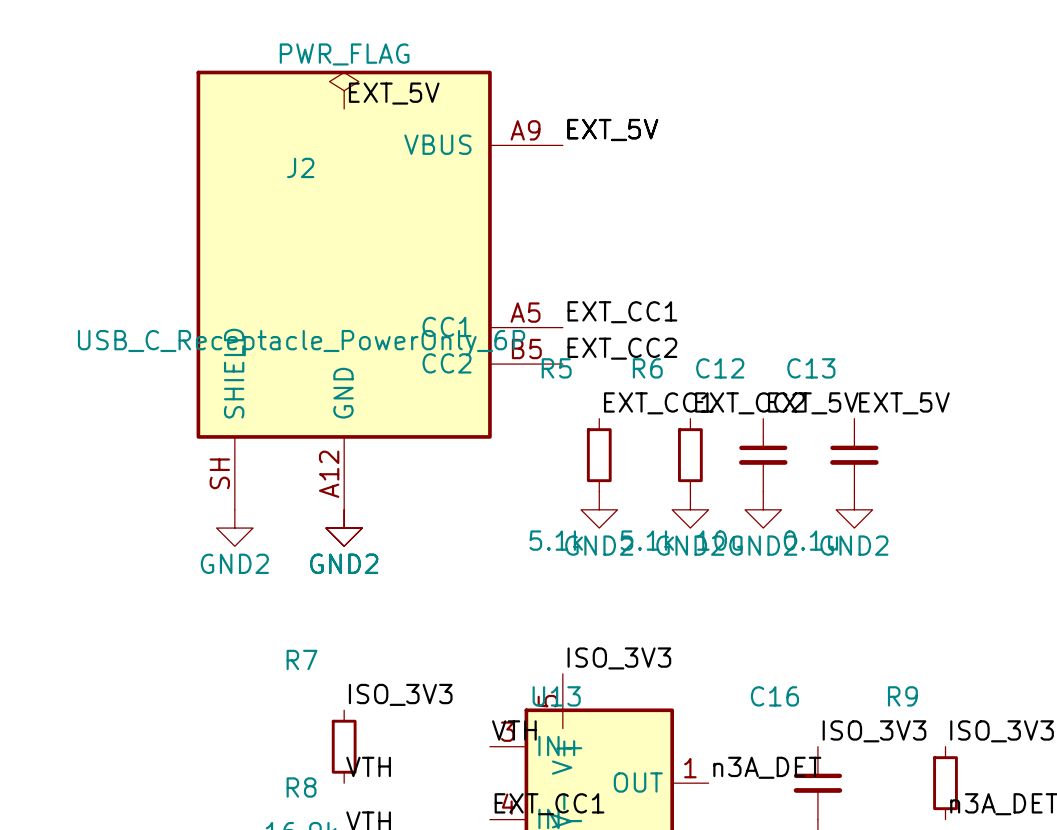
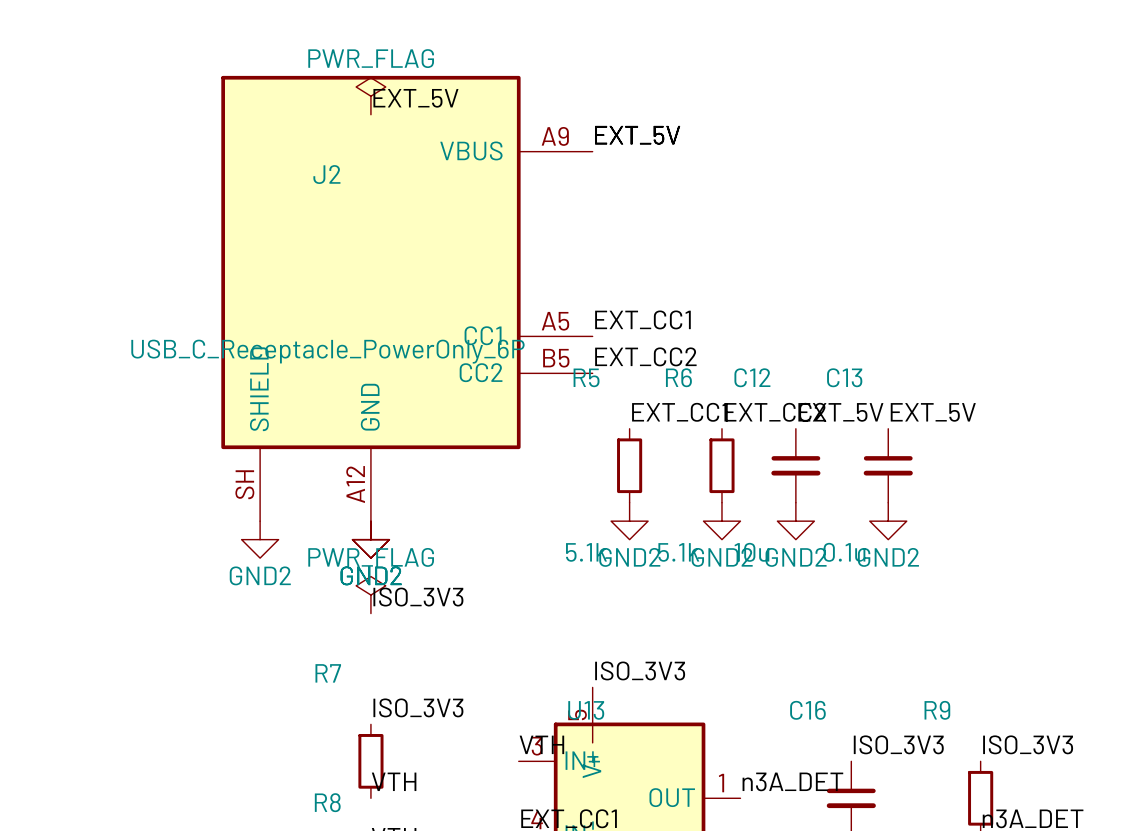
power symbol: none -> PWR_FLAG (370, 595)
label: none -> ISO_3V3 (418, 597)

